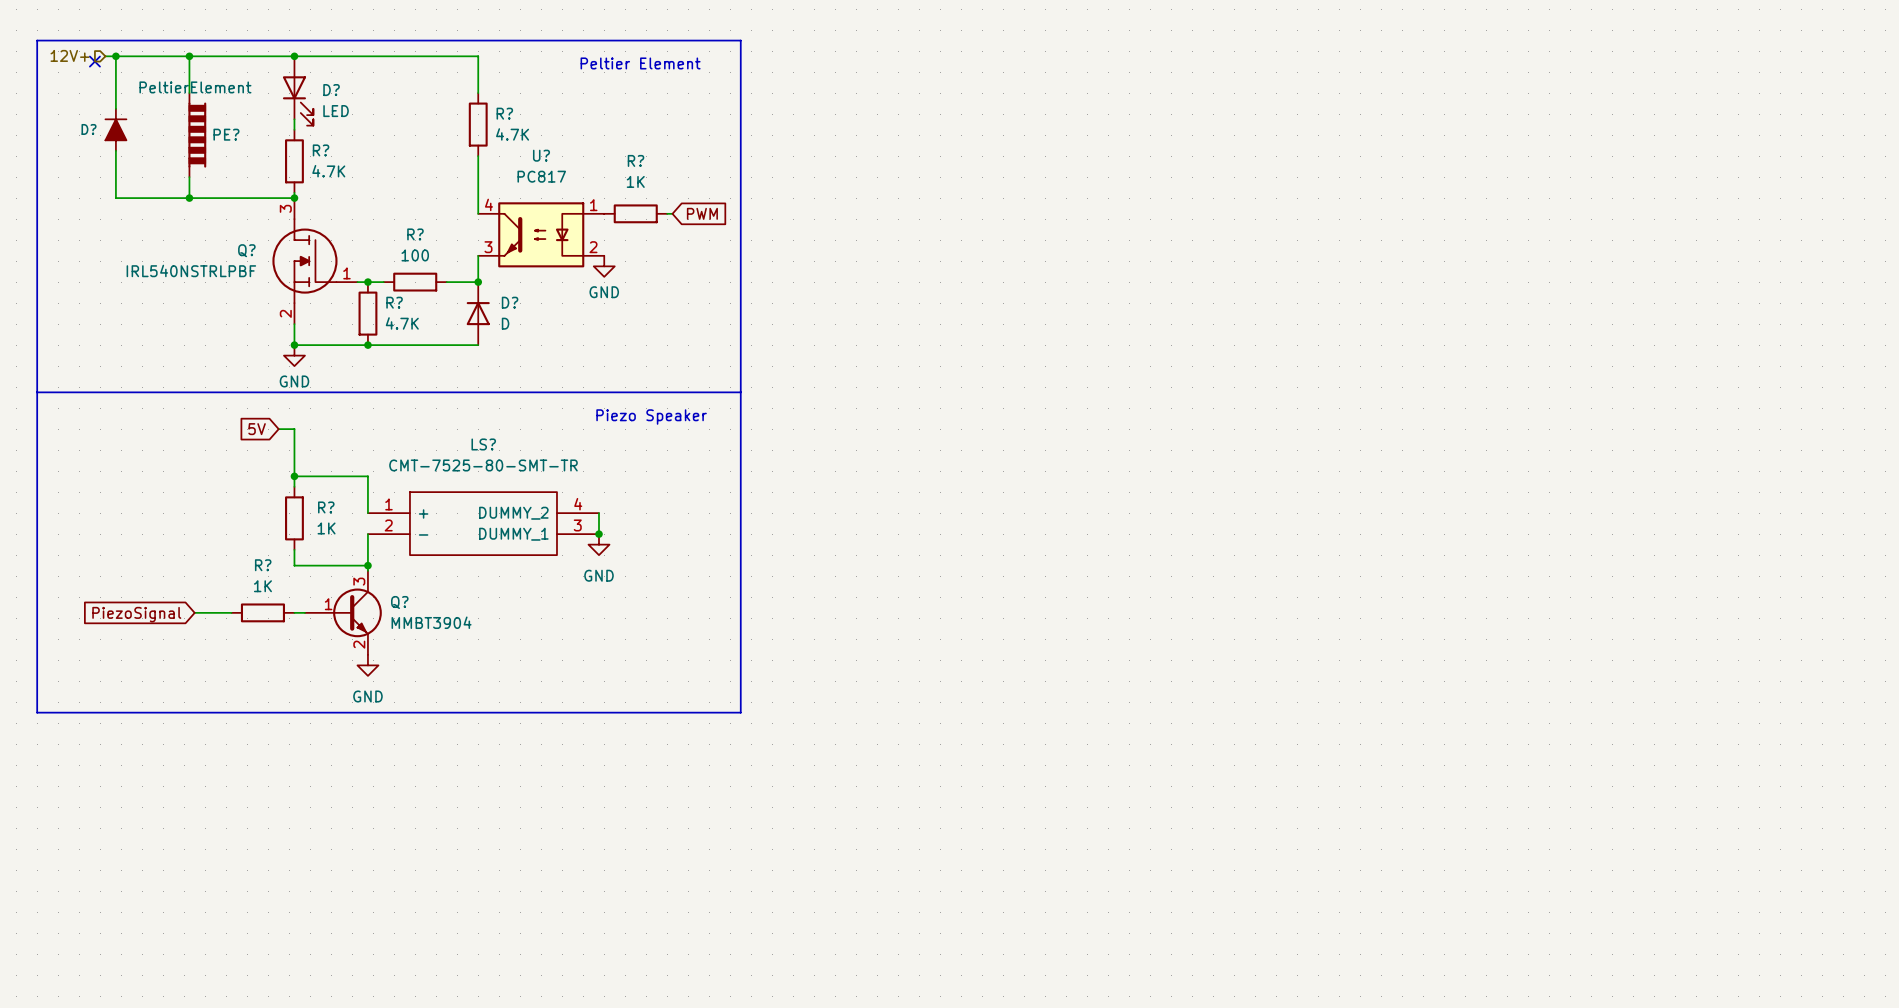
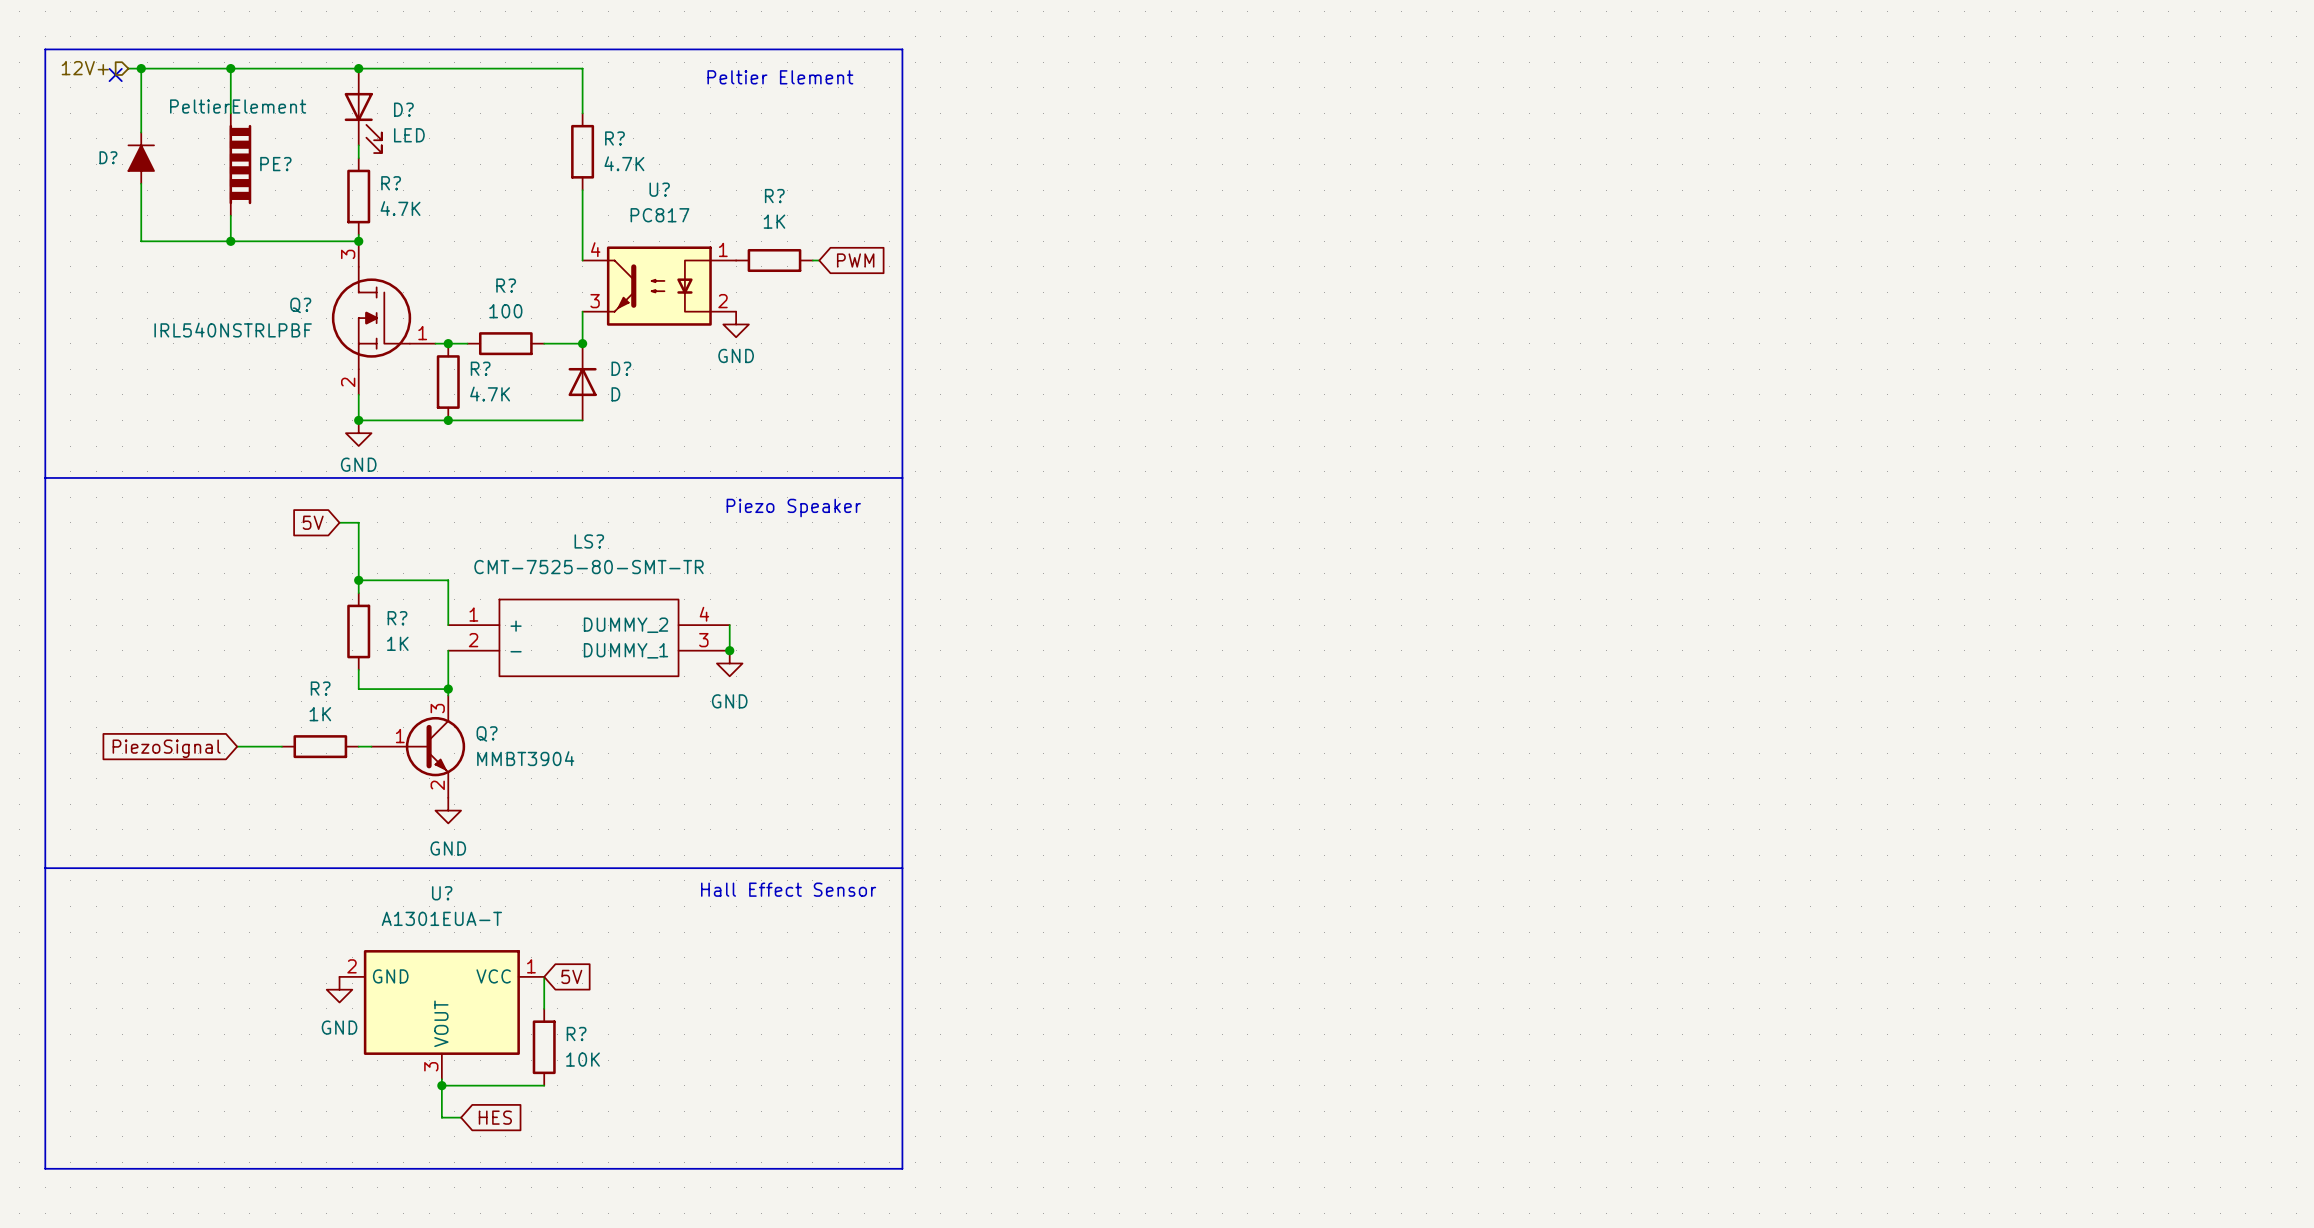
line: none -> (45, 868) (45, 1168) (902, 1168) (902, 868)
text: none -> Hall Effect Sensor (788, 889)
wire: none -> (544, 976) (544, 1008)
global label: none -> 5V (571, 976)
power symbol: none -> GND (339, 989)
U?: none -> A1301EUA-T (441, 1014)
R?: none -> 10K (544, 1047)
wire: none -> (441, 1079) (441, 1117) (461, 1117)
wire: none -> (441, 1085) (544, 1085)
junction: none -> (441, 1085)
global label: none -> HES (495, 1117)

